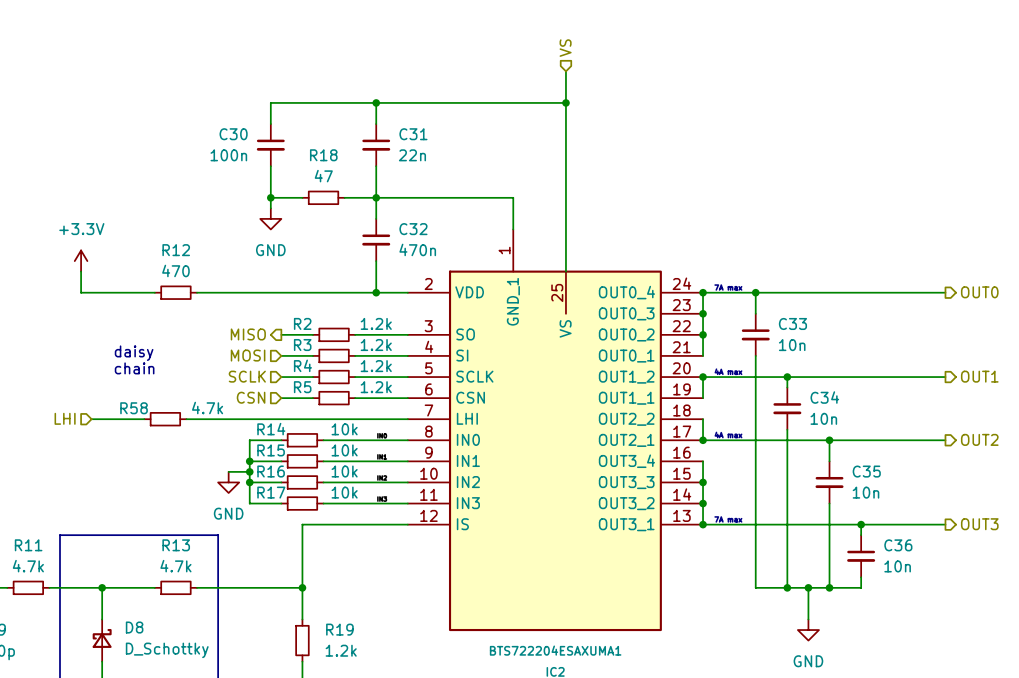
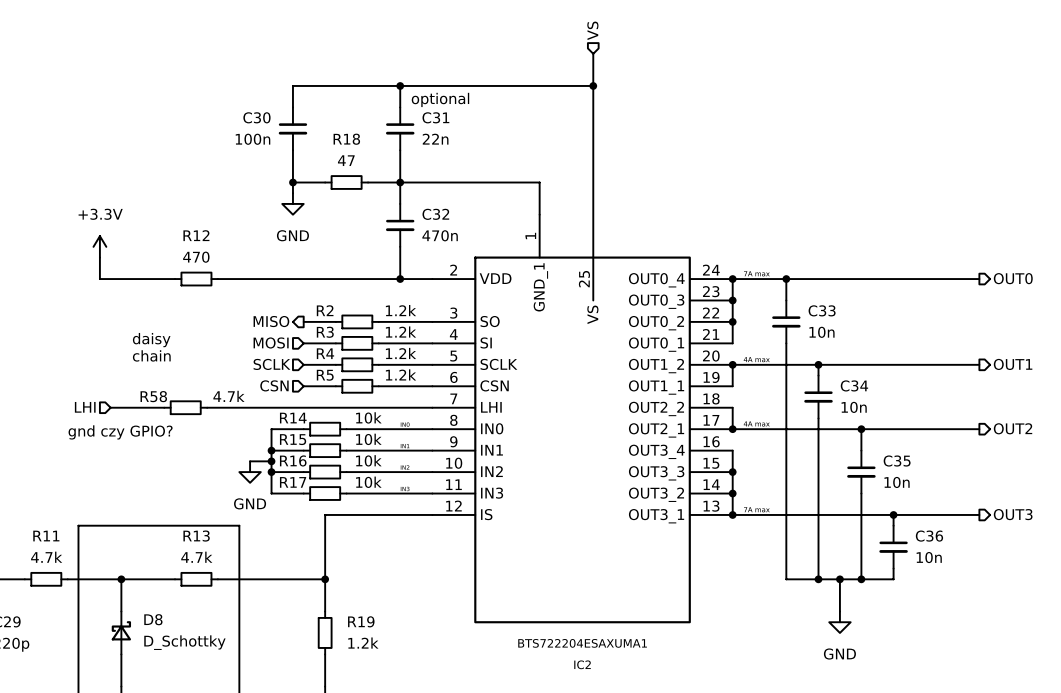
text: none -> optional (440, 99)
text: none -> gnd czy GPIO? (120, 432)

